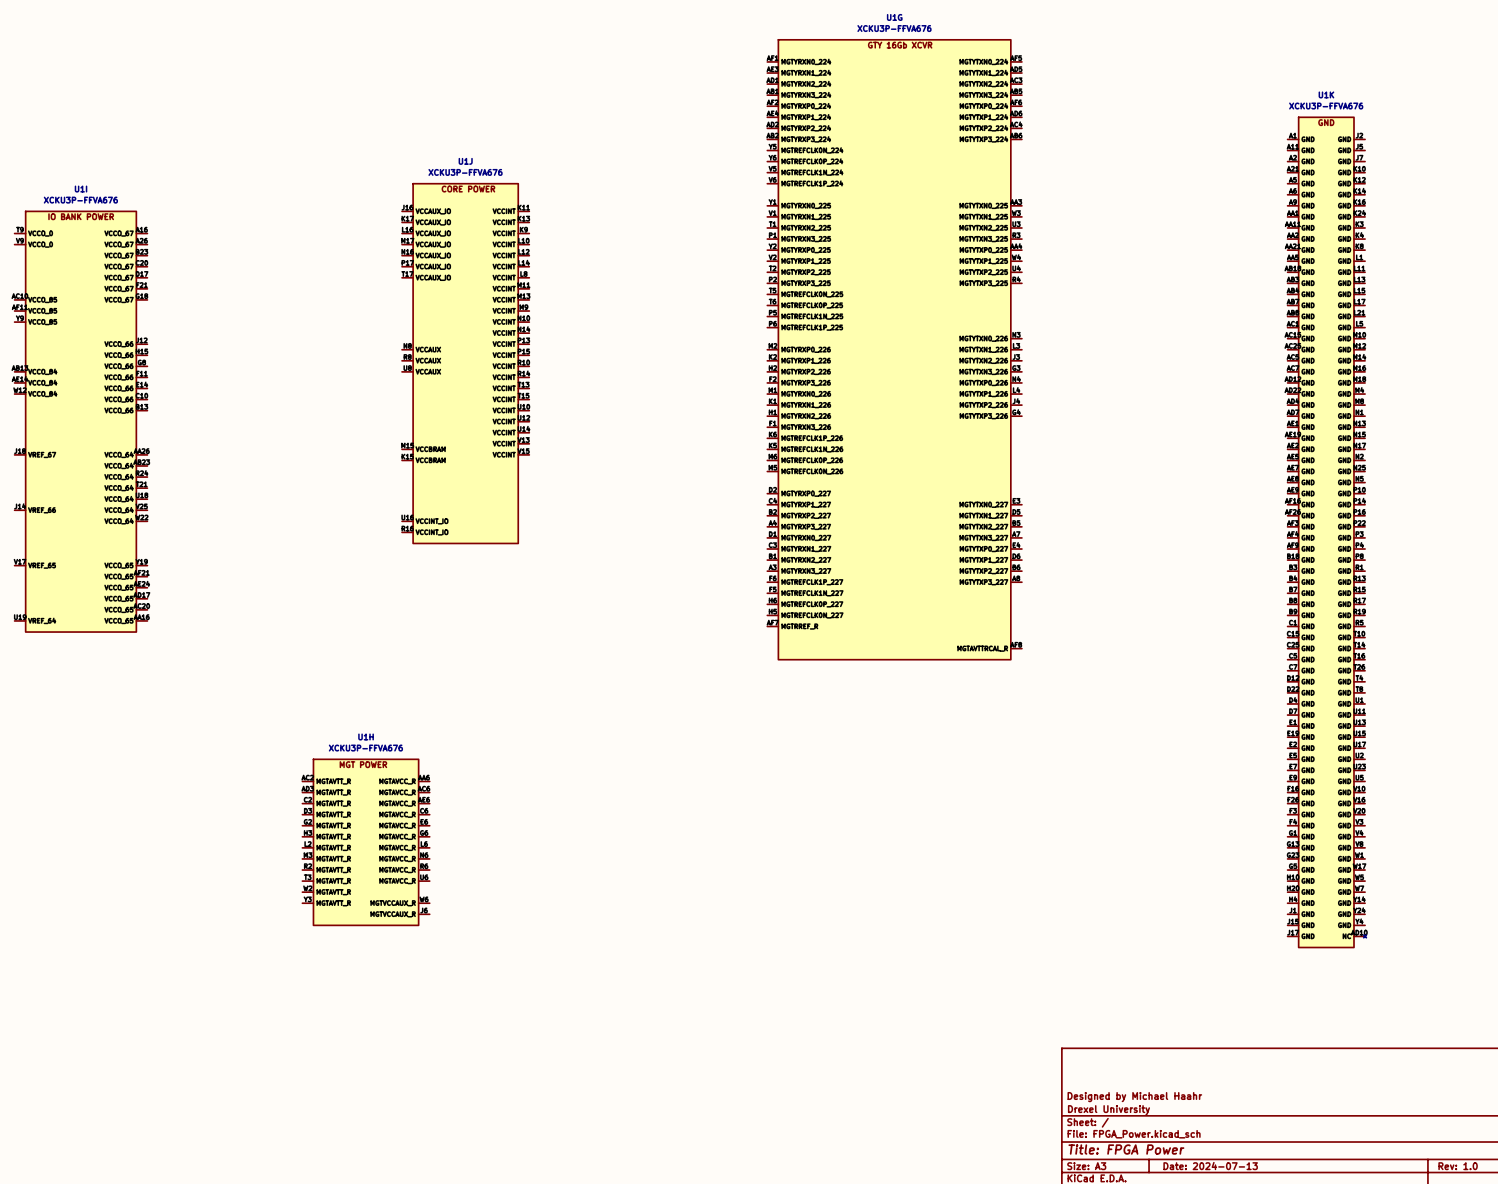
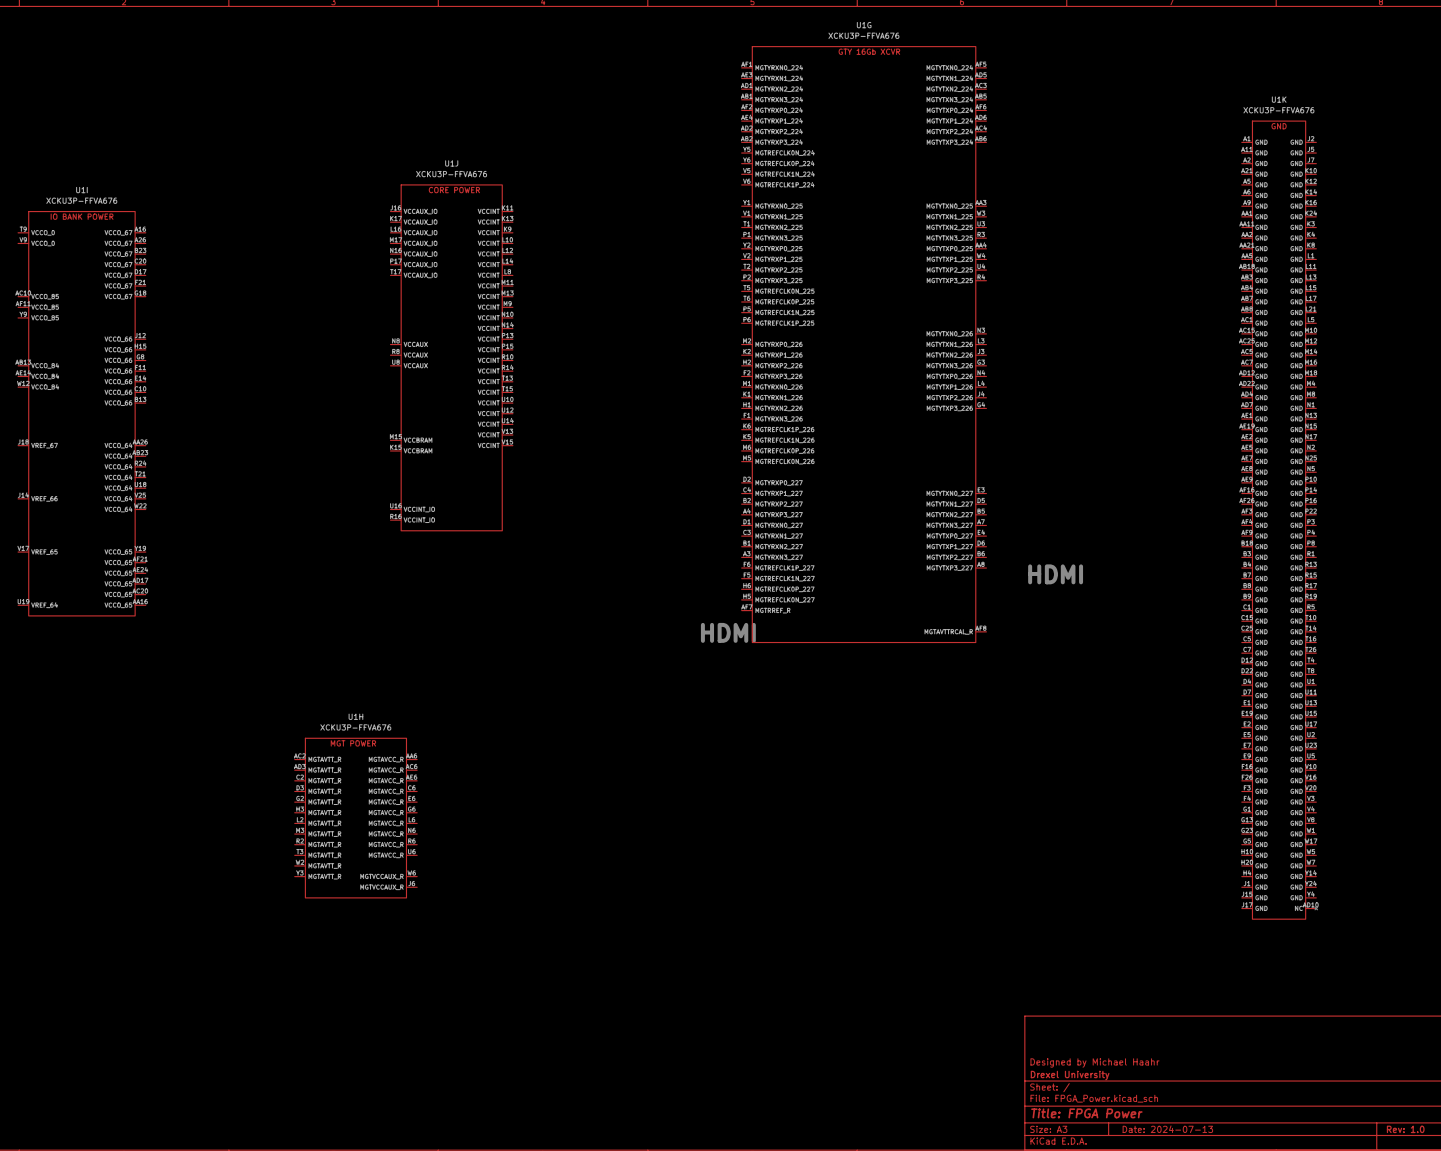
text: none -> HDMI (1055, 574)
text: none -> HDMI (728, 632)

